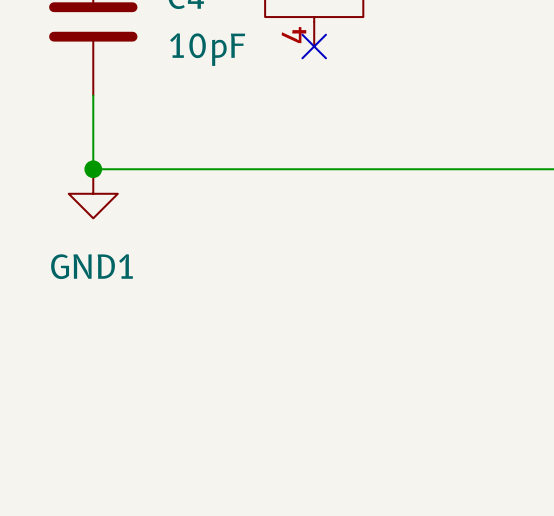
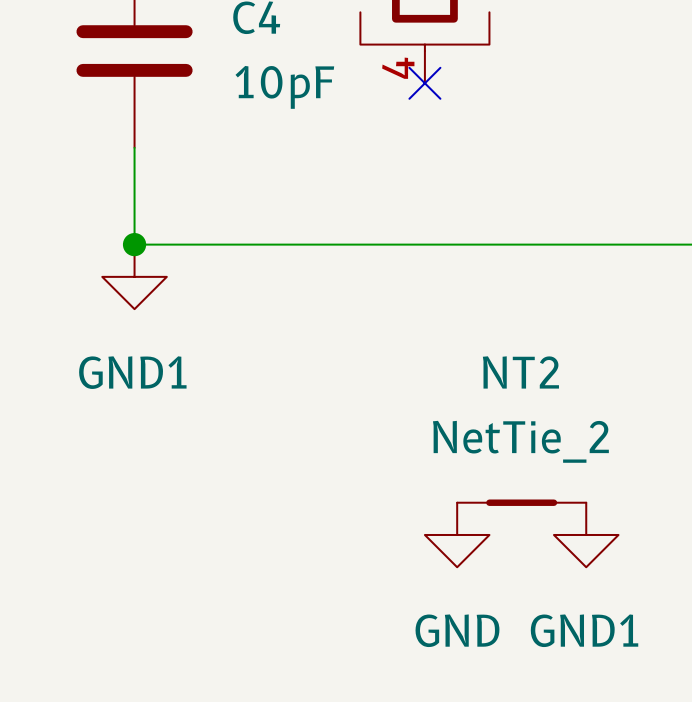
NT2: none -> NetTie_2 (521, 502)
power symbol: none -> GND (457, 534)
power symbol: none -> GND1 (586, 534)

